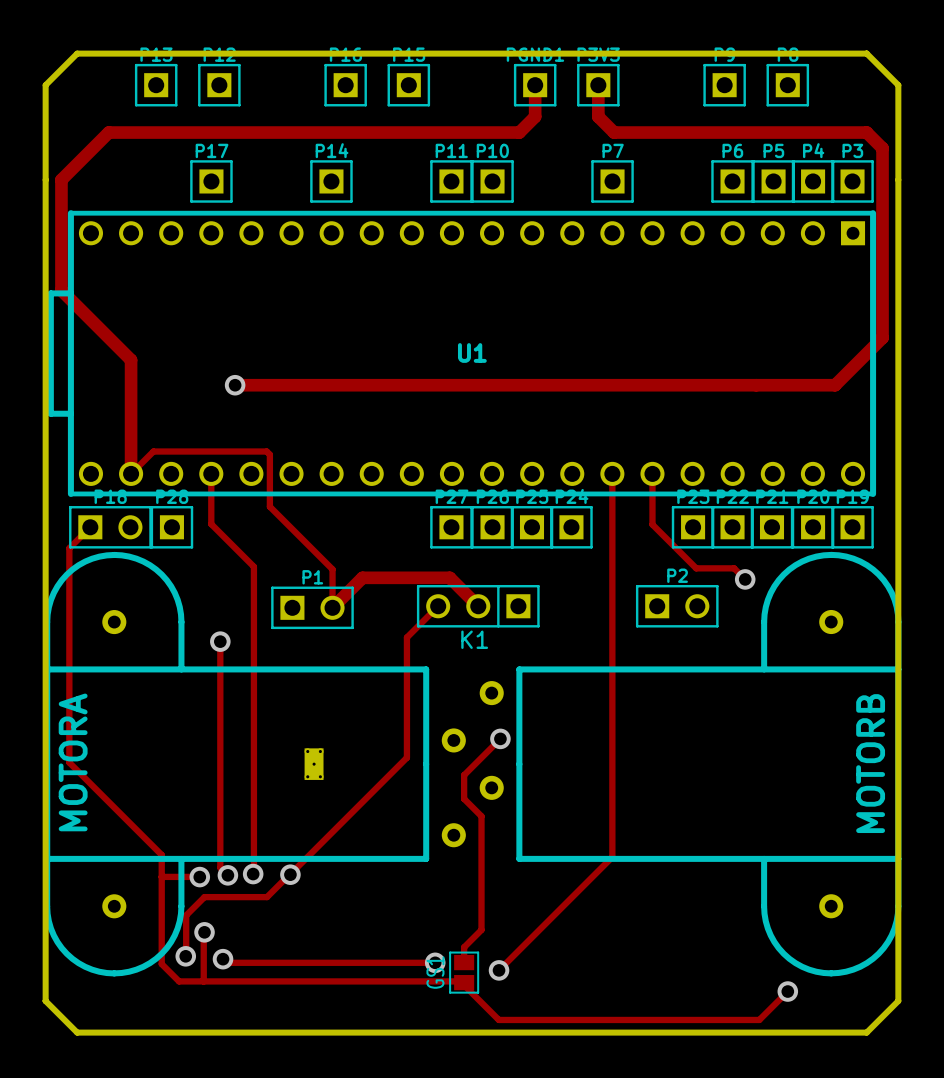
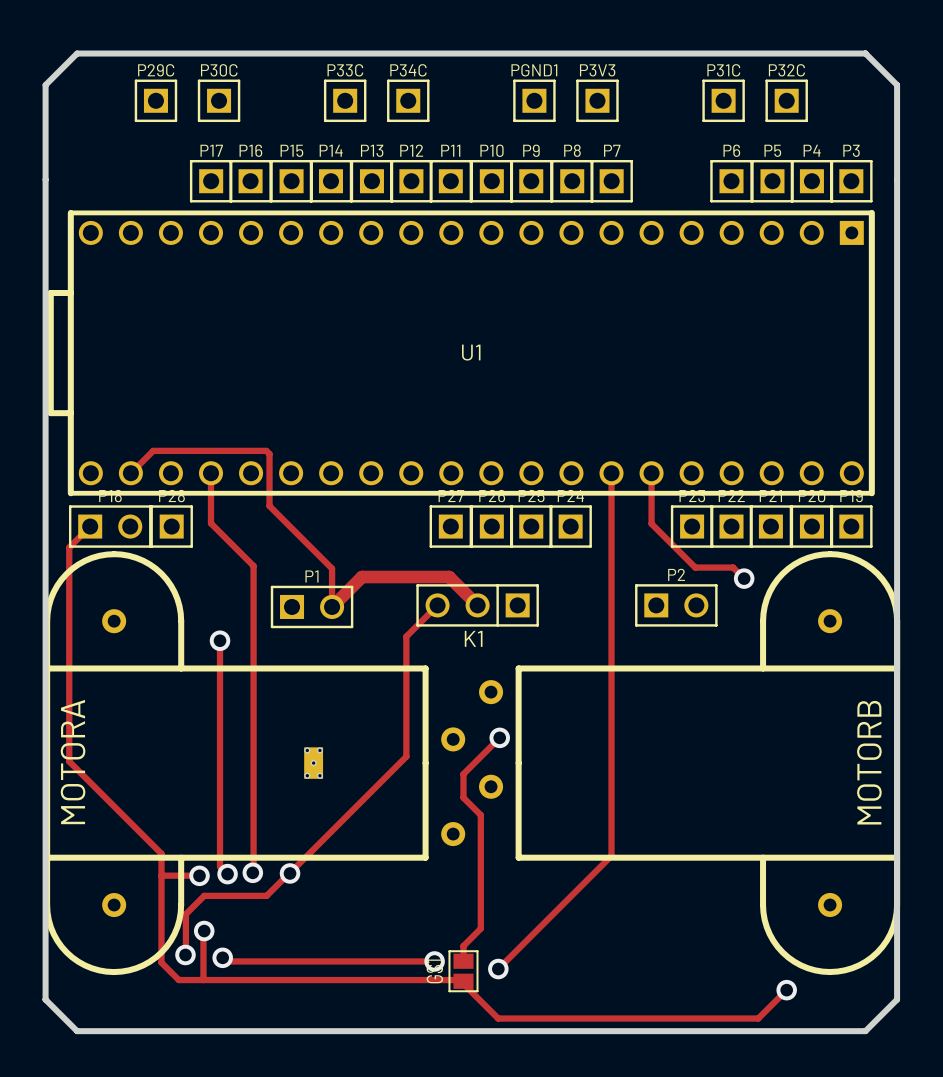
P13 position: (156, 85) -> (371, 181)
P12 position: (219, 85) -> (411, 181)
P16 position: (345, 85) -> (250, 181)
P15 position: (408, 85) -> (291, 181)
track: (535, 85) (535, 116) (519, 132) (108, 132) (61, 179) (61, 290) (131, 360) (131, 473) -> none
PGND1 position: (535, 85) -> (534, 100)
track: (598, 85) (598, 116) (614, 132) (866, 132) (882, 148) (882, 337) (835, 385) (235, 385) -> none
P3V3 position: (598, 85) -> (597, 100)
P9 position: (724, 85) -> (531, 181)
P8 position: (787, 85) -> (572, 181)
P29C: none -> (155, 100)
P30C: none -> (219, 100)
P33C: none -> (345, 100)
P34C: none -> (408, 100)
P31C: none -> (723, 100)
P32C: none -> (786, 100)
via: (235, 385) -> none

